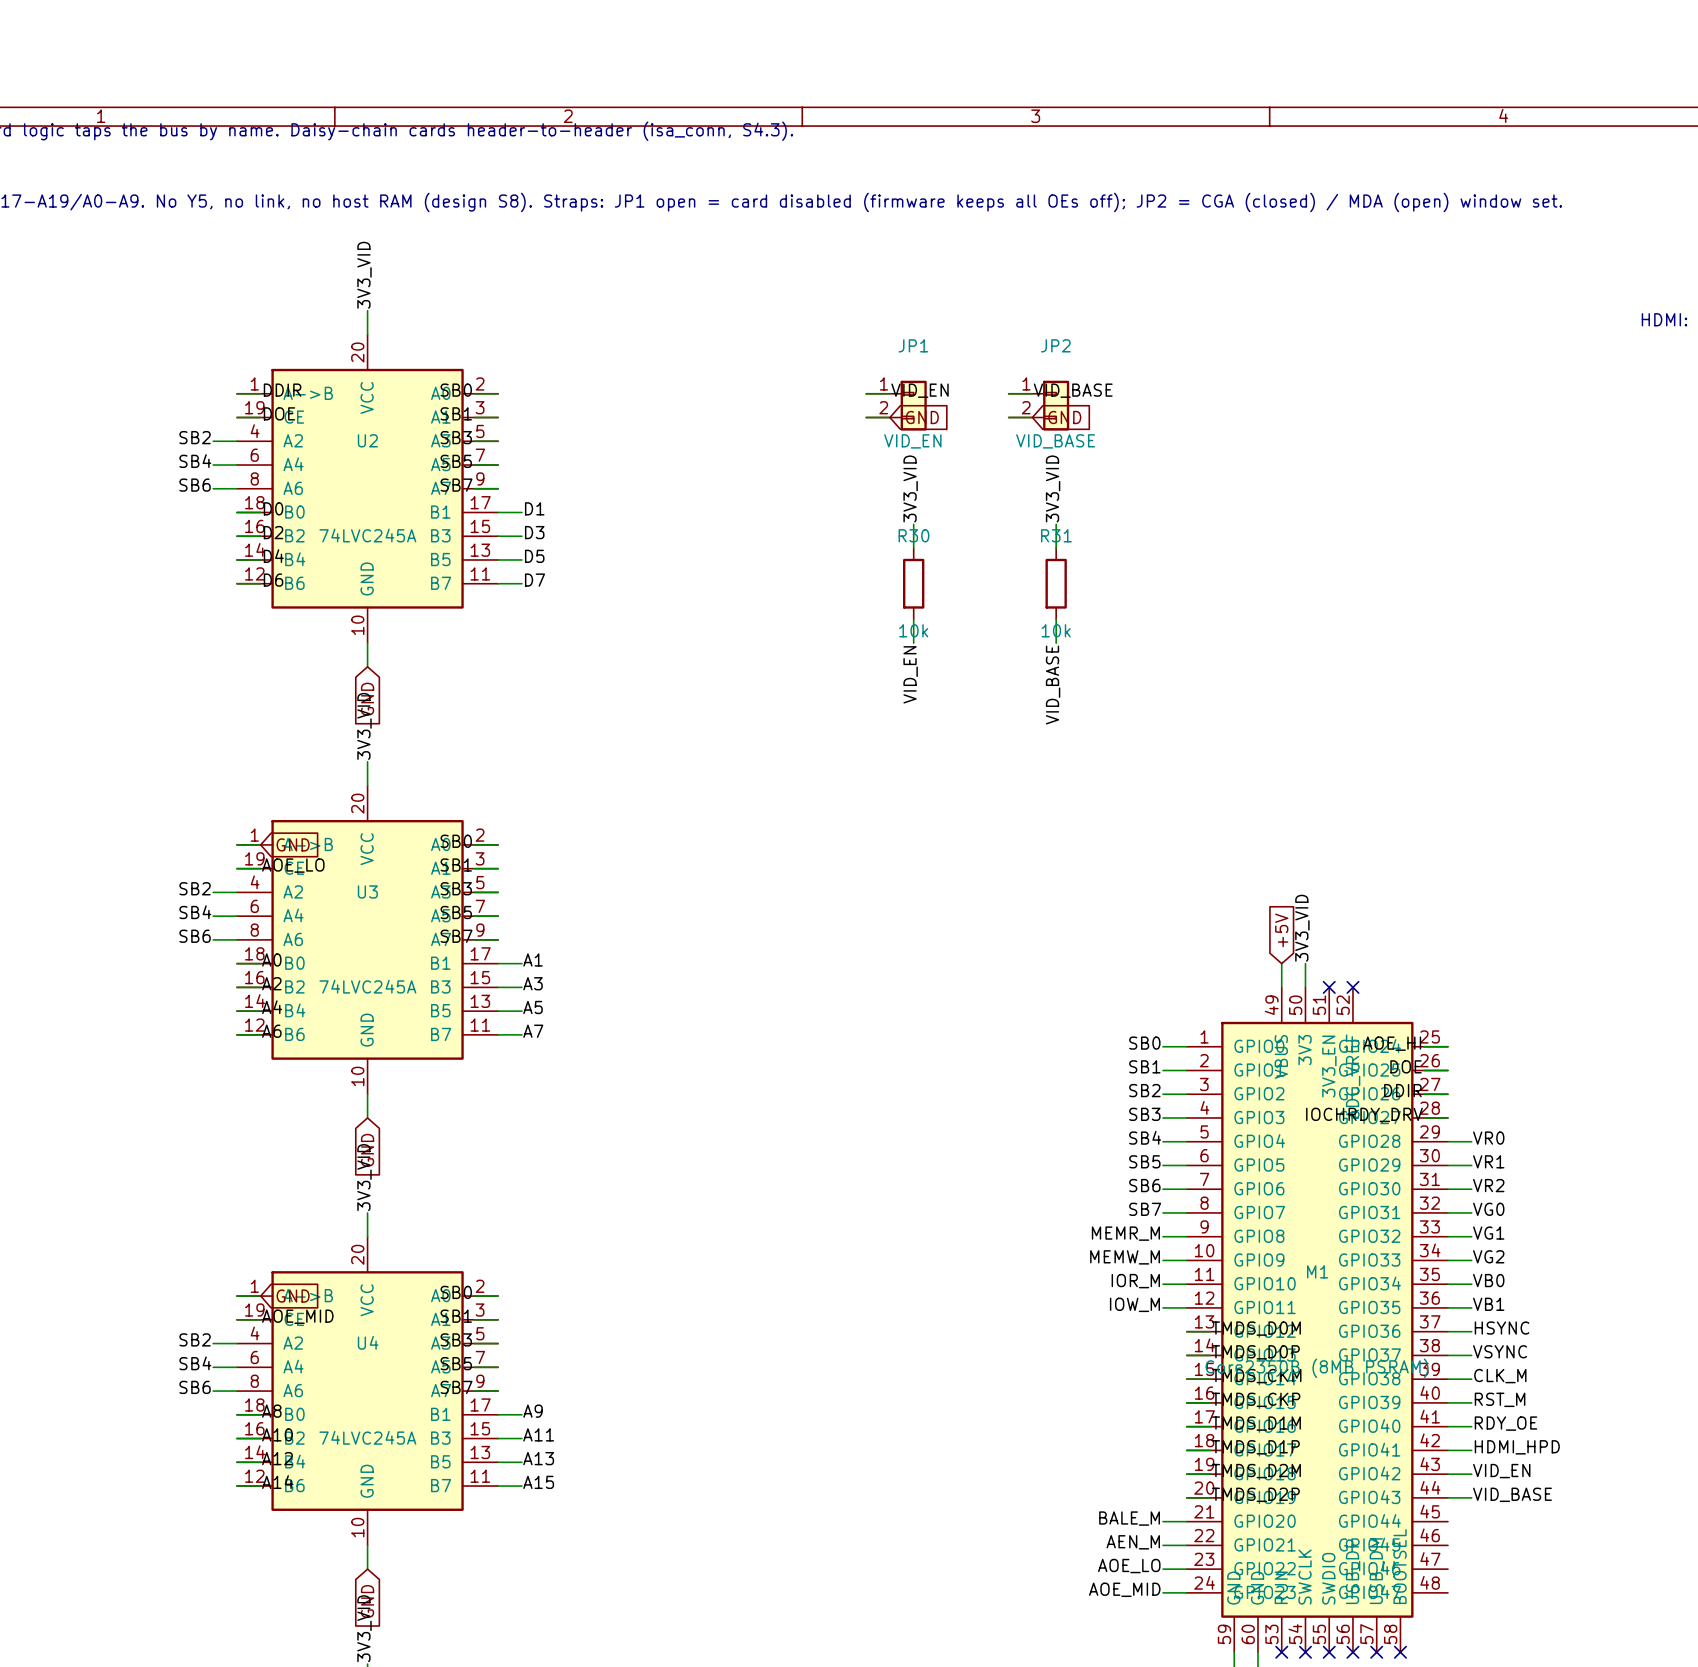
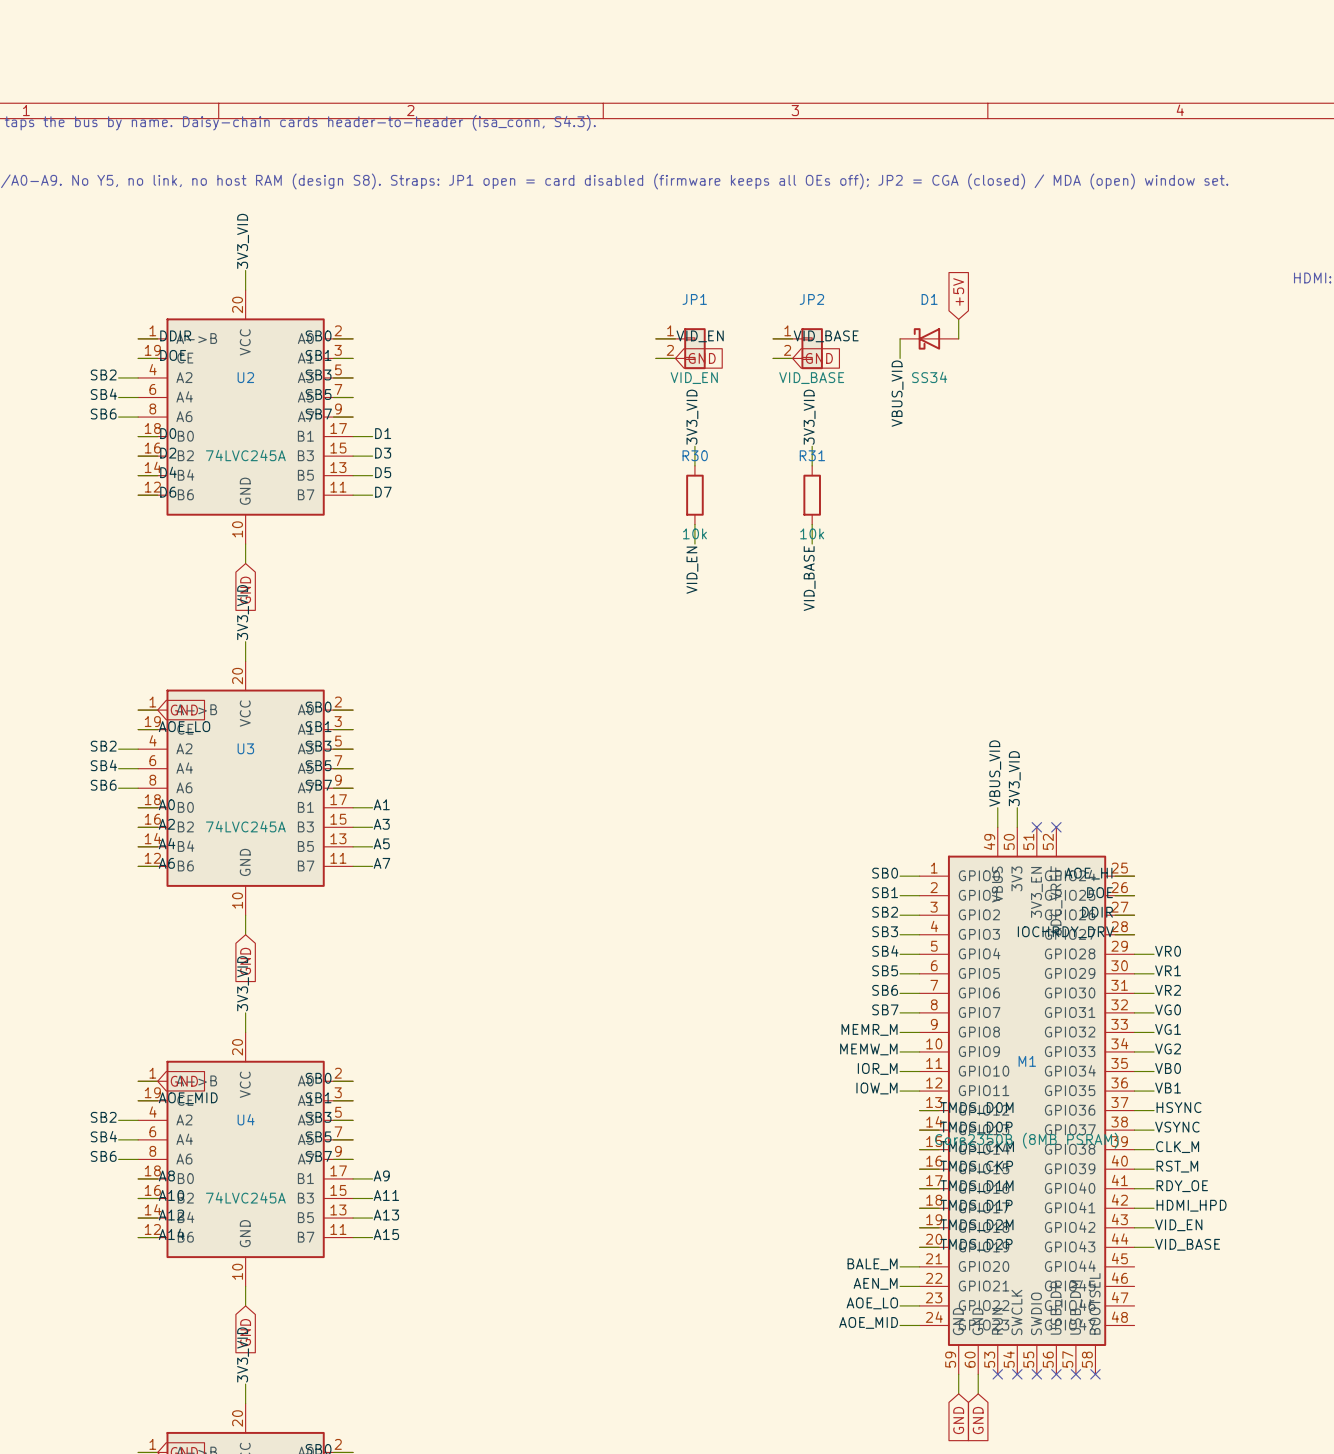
global label: none -> +5V (958, 292)
wire: none -> (958, 319) (958, 338)
wire: none -> (900, 338) (900, 358)
D1: none -> SS34 (929, 338)
label: none -> VBUS_VID (897, 393)
label: none -> VBUS_VID (995, 773)
global label: +5V (1281, 930) -> none

